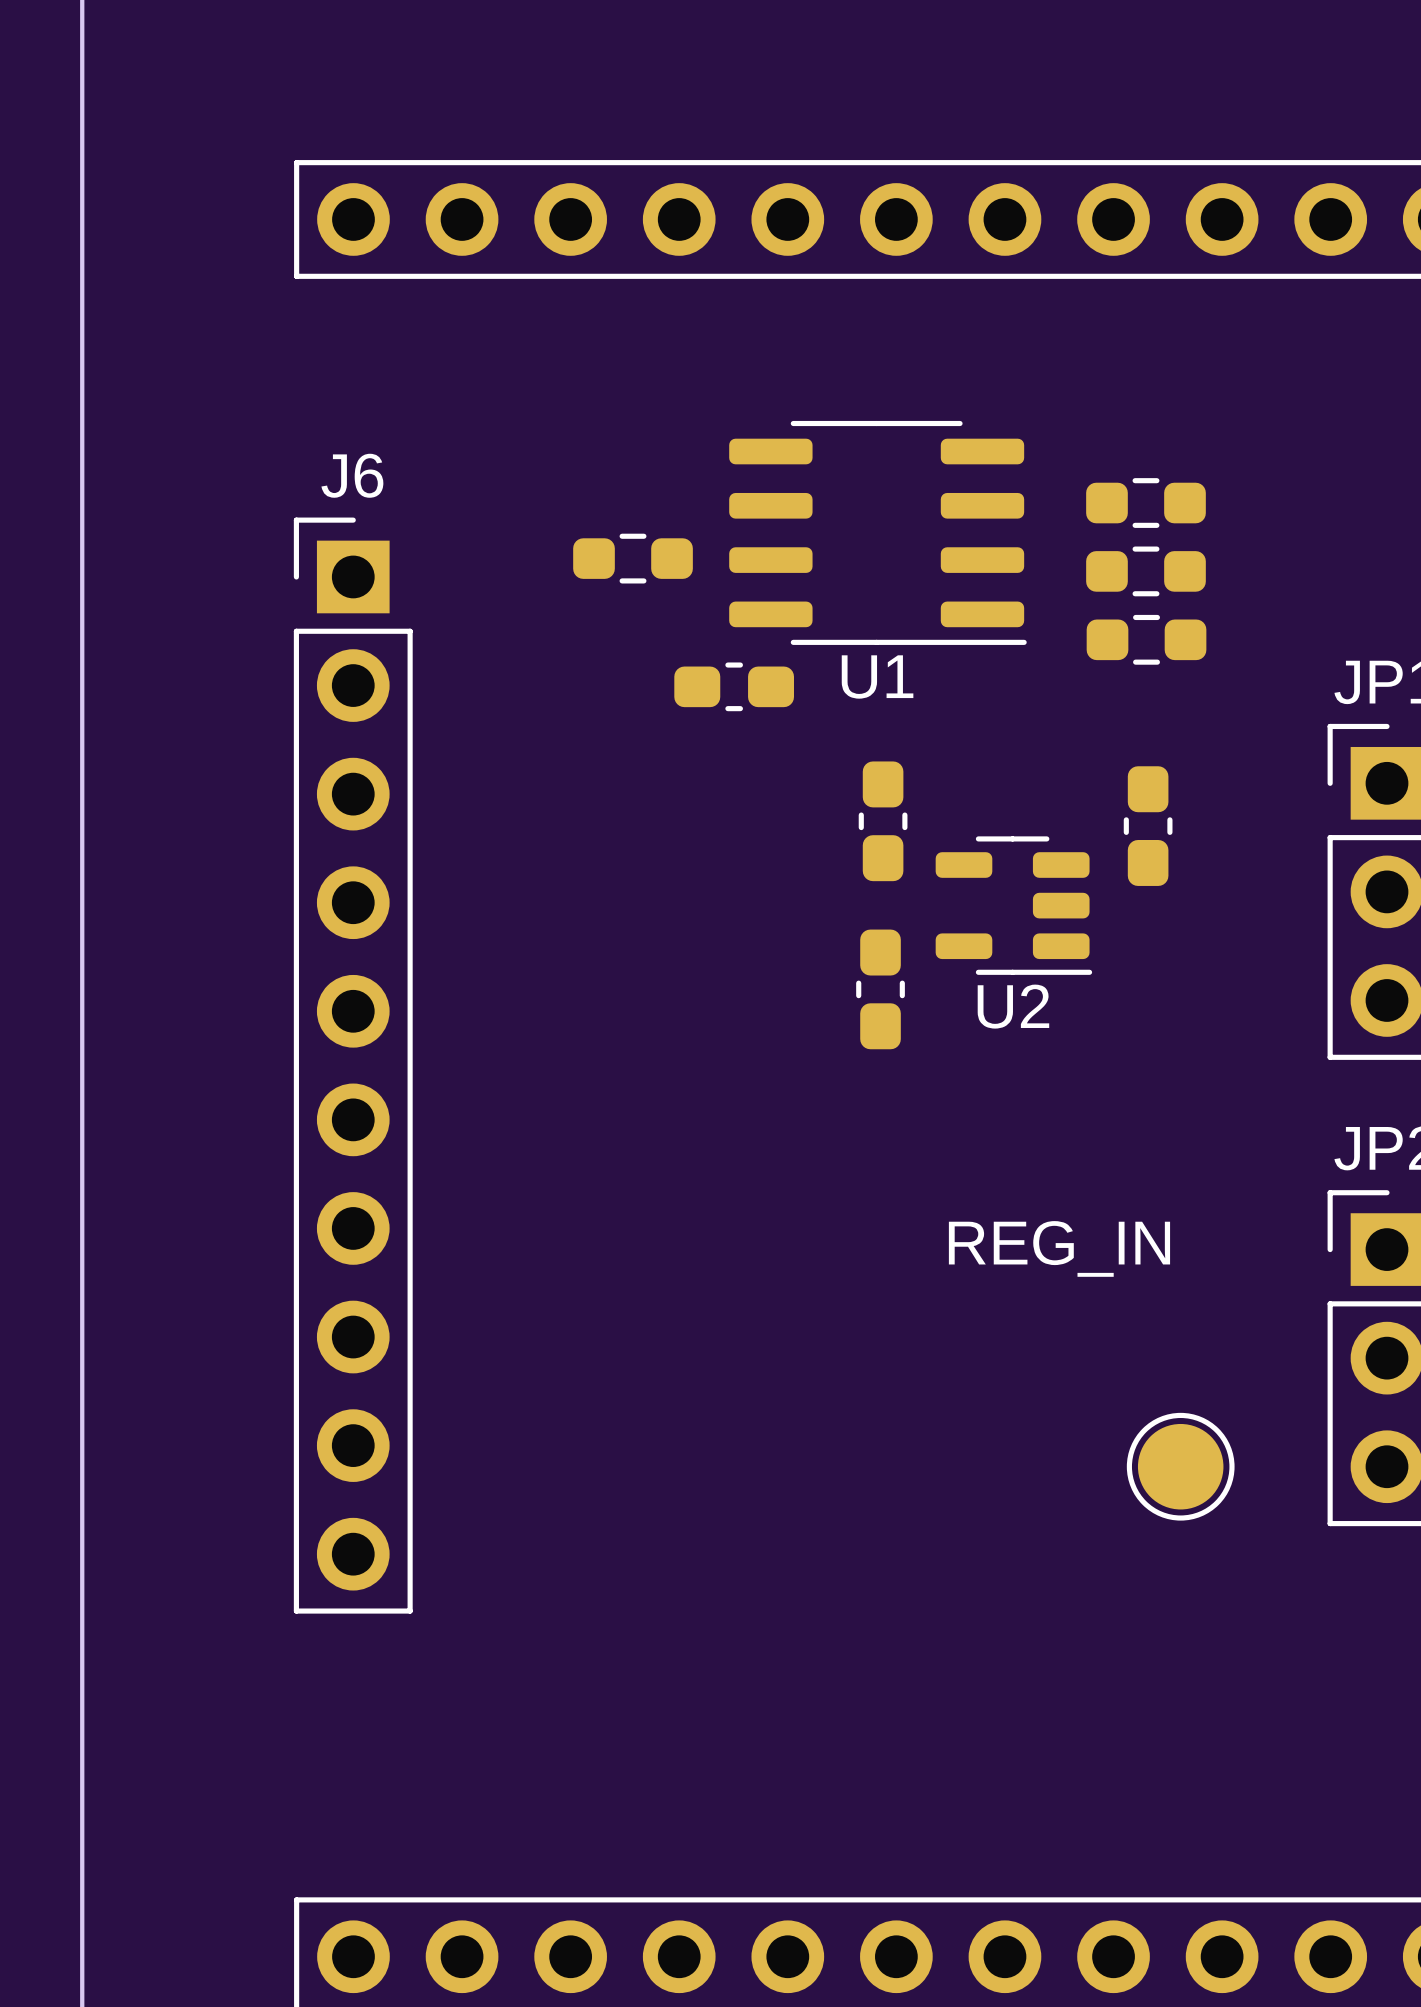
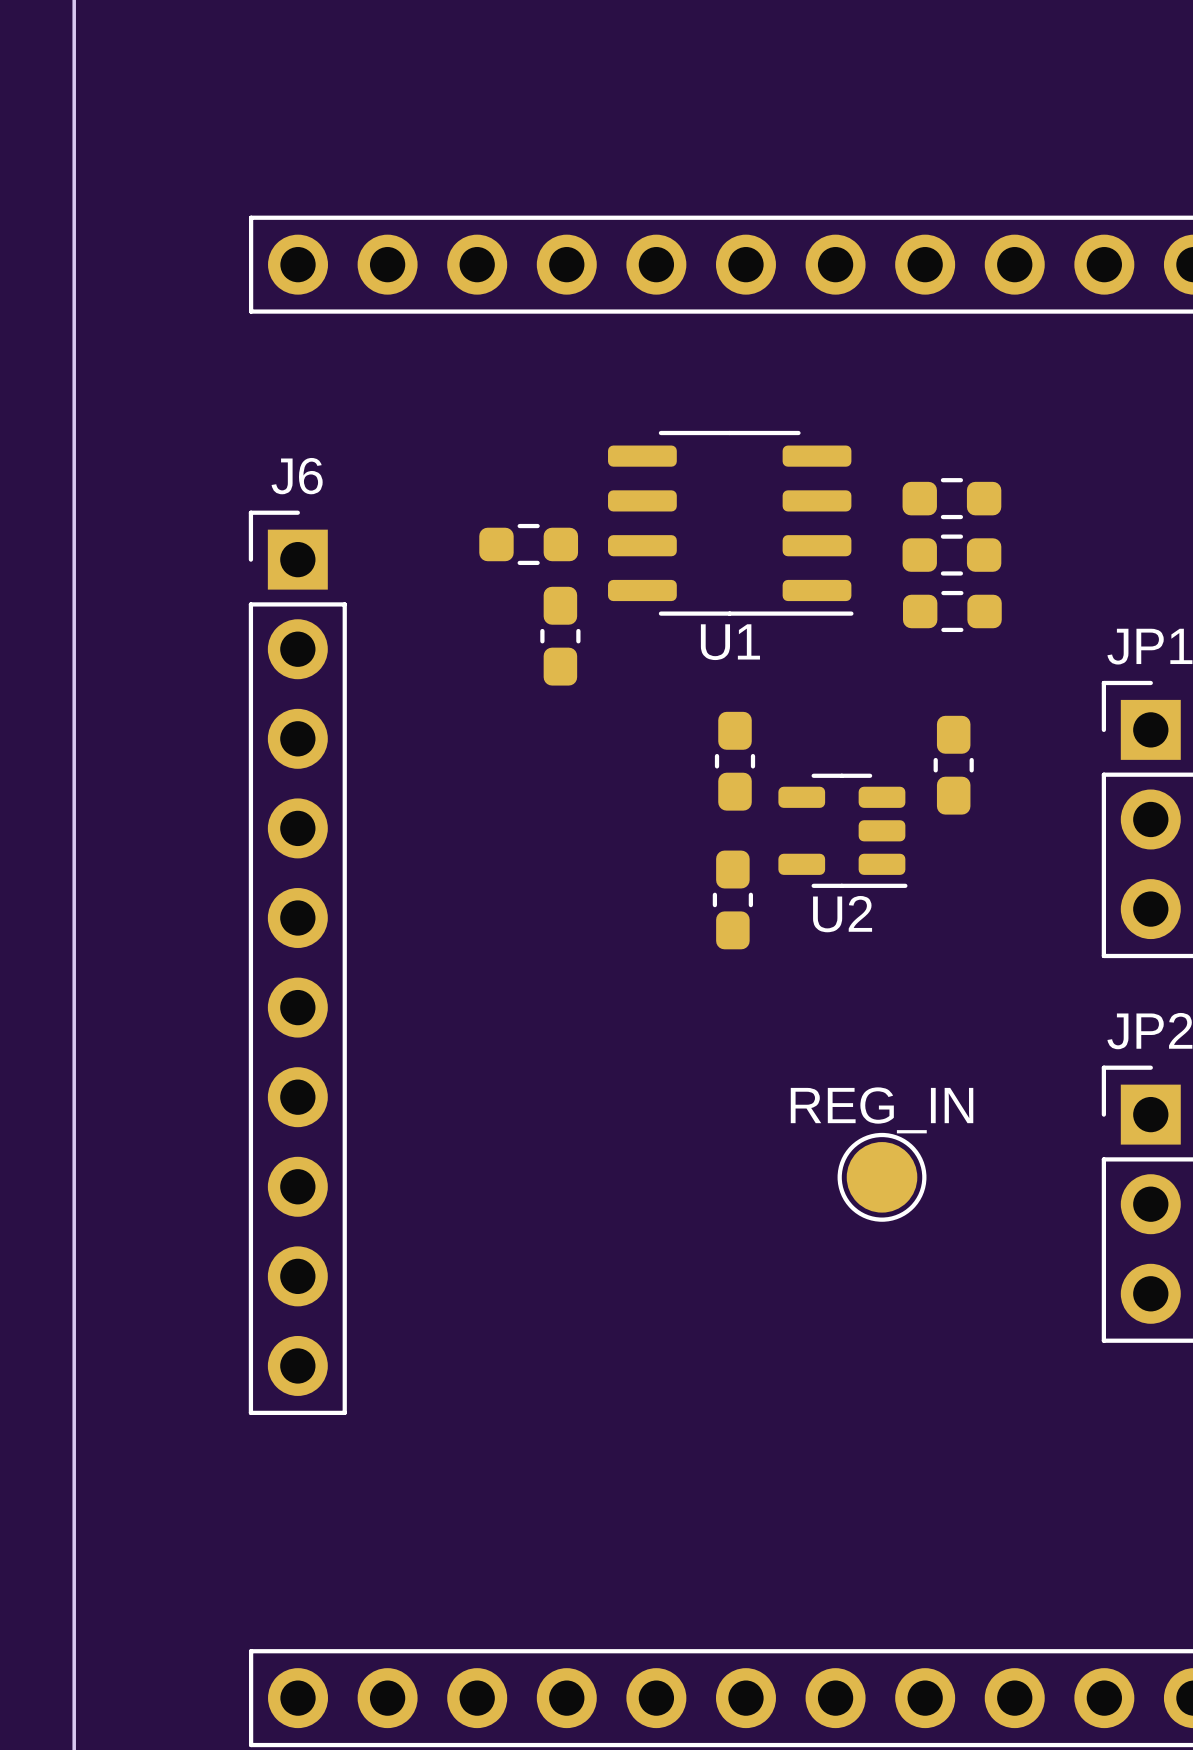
part rotation: 0° (734, 686) -> 90° clockwise (560, 636)
text: REG_IN (1059, 1248) -> none
REG_IN: none -> (882, 1177)
part: (1180, 1466) -> none

